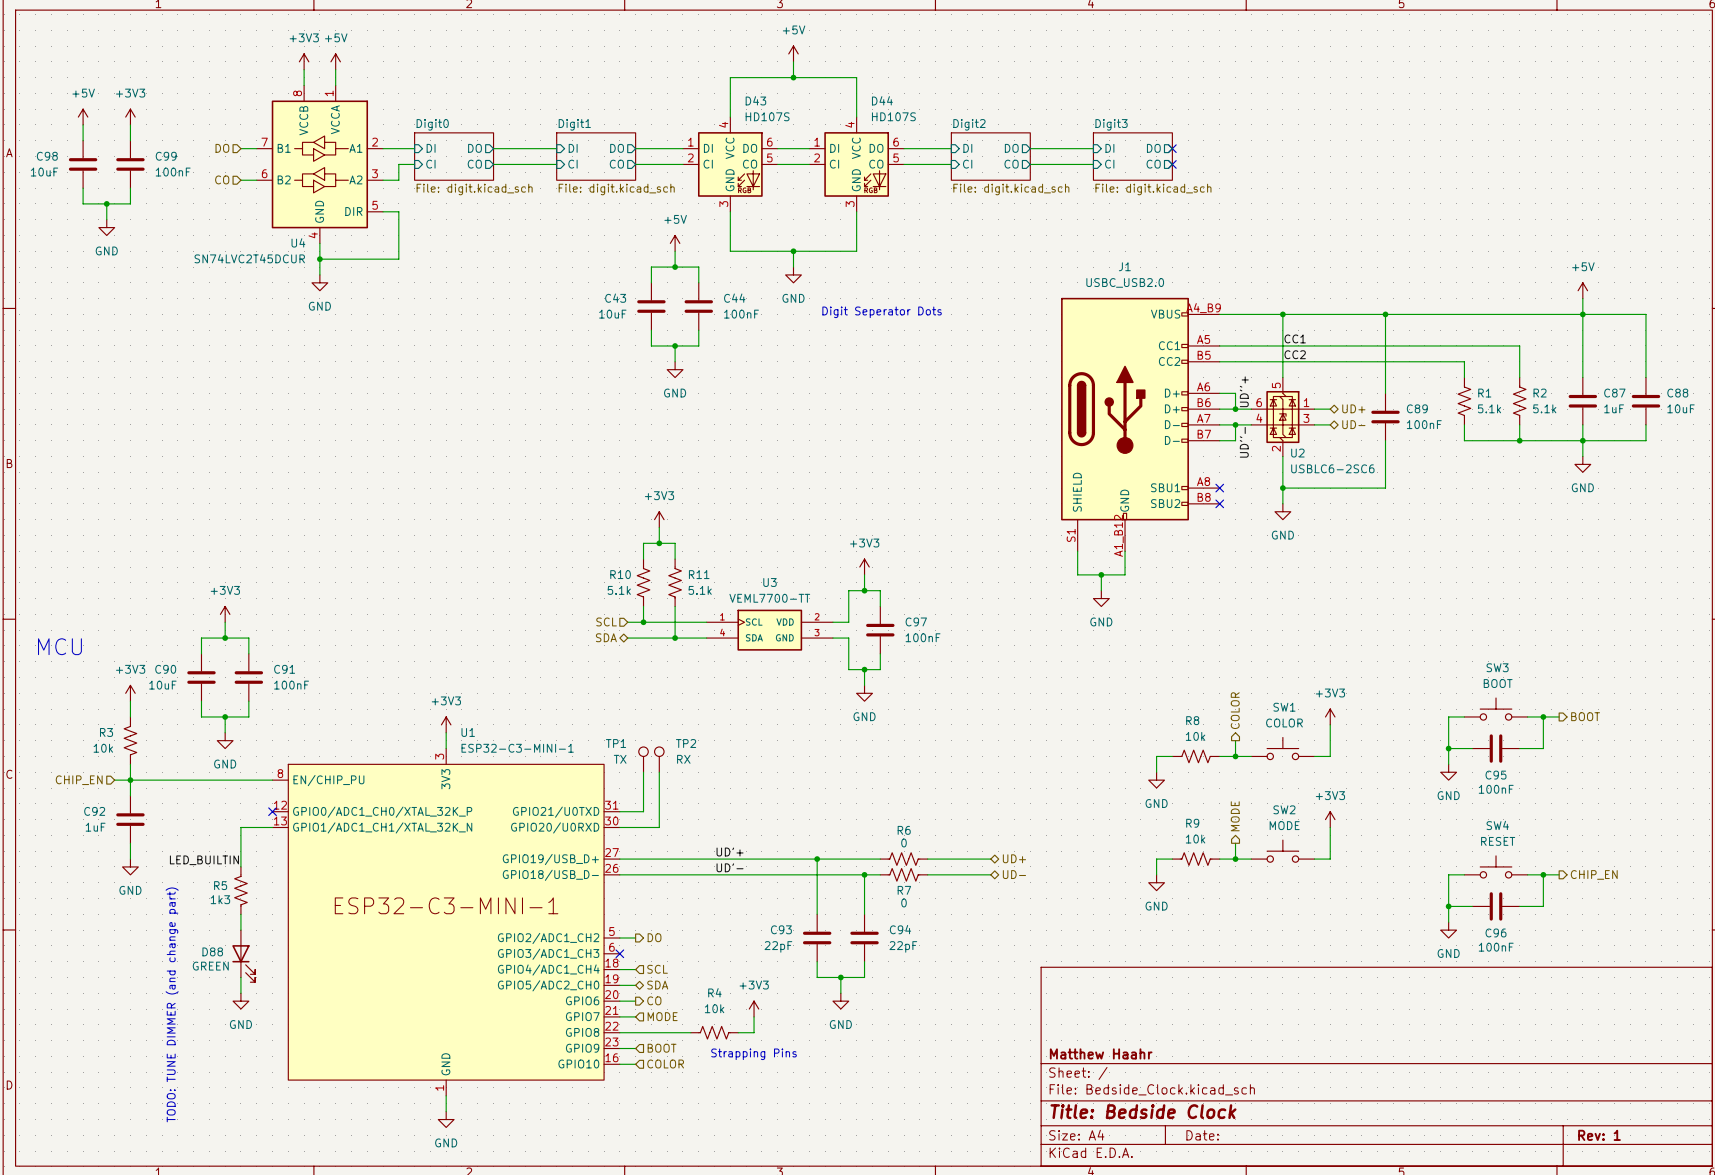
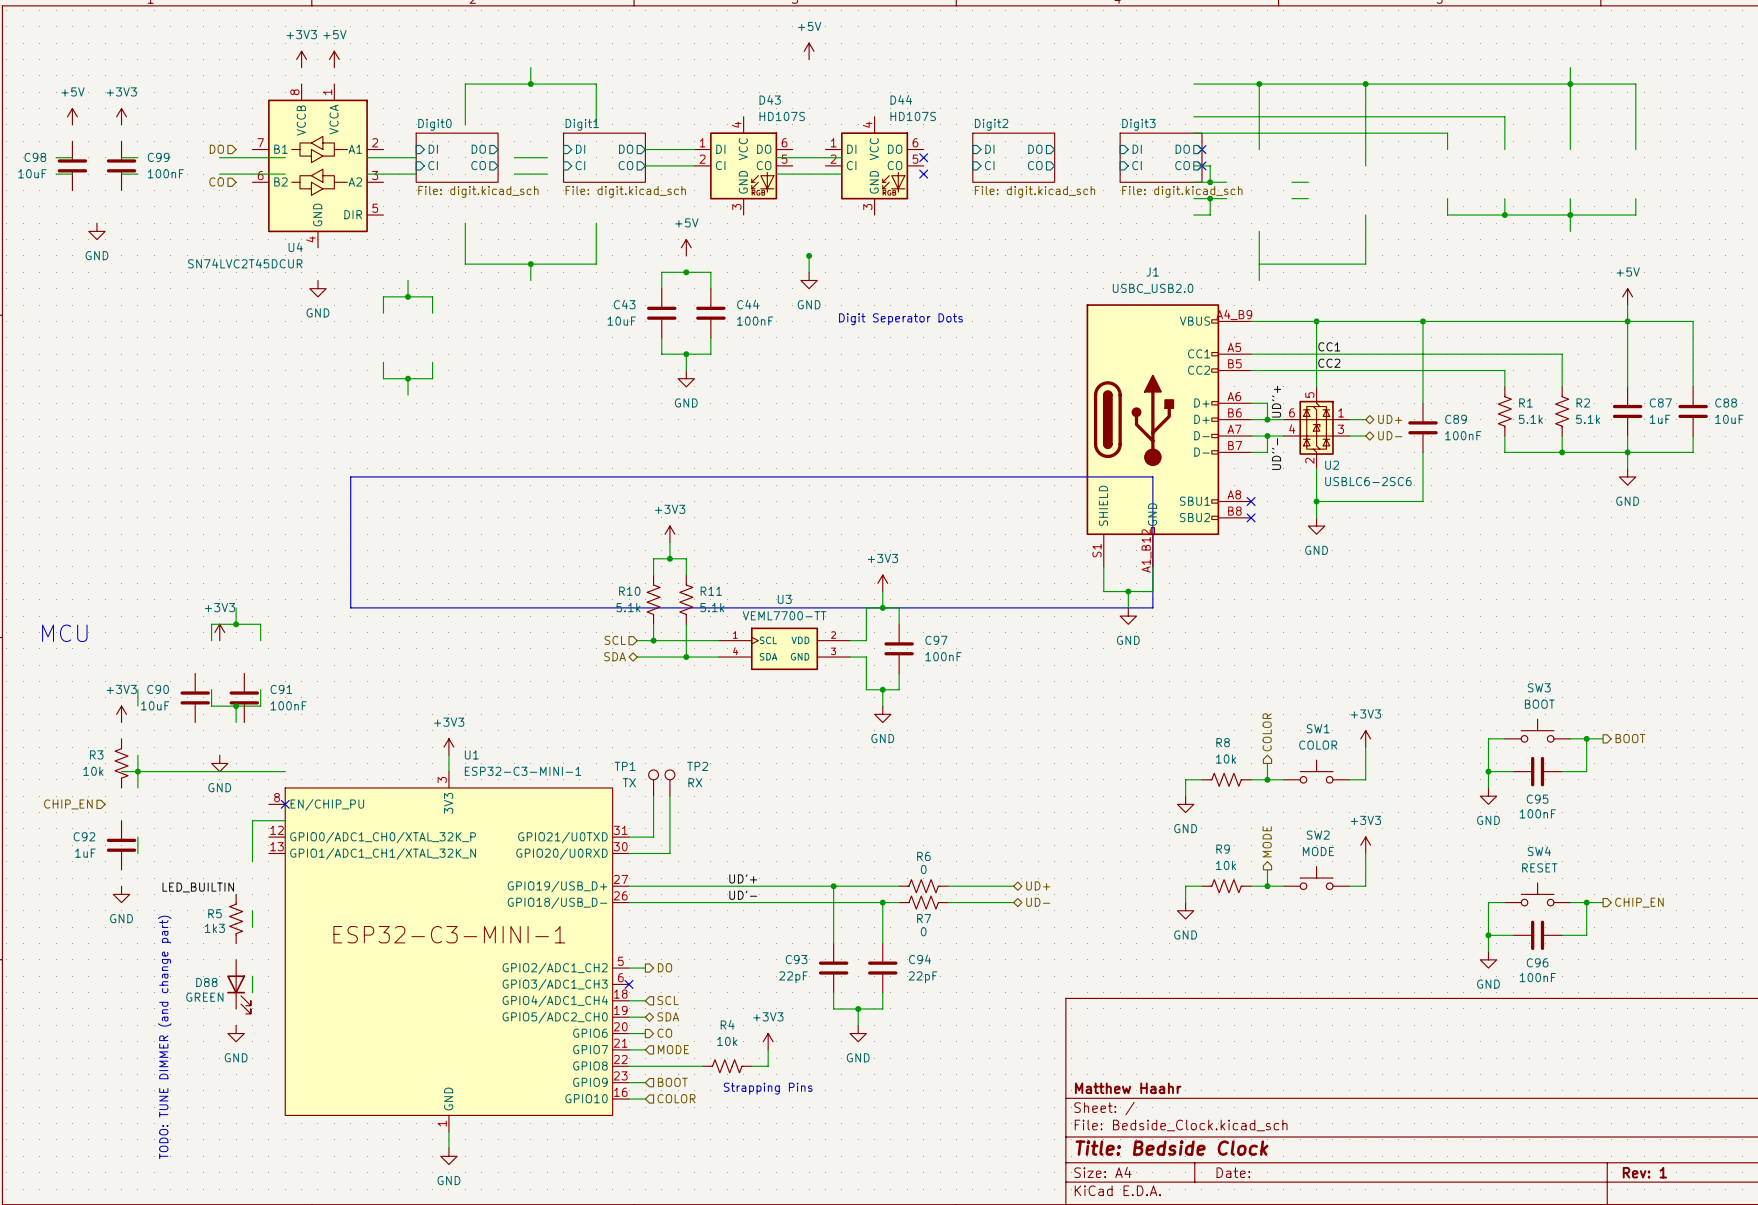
wire: (793, 61) (793, 77) -> none
wire: (304, 69) (304, 85) -> none
wire: (335, 69) (335, 85) -> none
wire: none -> (530, 67) (530, 84)
wire: none -> (1570, 67) (1570, 149)
junction: (793, 77) -> none
junction: none -> (530, 84)
wire: none -> (1193, 84) (1635, 84) (1635, 149)
wire: none -> (1259, 84) (1259, 149)
junction: none -> (1259, 84)
wire: none -> (1365, 84) (1365, 165)
junction: none -> (1365, 84)
junction: none -> (1570, 84)
wire: (730, 117) (730, 77) (856, 77) (856, 117) -> none
wire: none -> (1193, 116) (1504, 116) (1504, 149)
wire: (83, 124) (83, 140) -> none
wire: (130, 124) (130, 140) -> none
wire: none -> (465, 124) (465, 84) (596, 84) (596, 124)
wire: none -> (1193, 133) (1447, 133) (1447, 149)
wire: (240, 148) (256, 148) -> (121, 157) (137, 157)
wire: (383, 148) (414, 148) -> (514, 157) (547, 157)
wire: (493, 148) (556, 148) -> none
wire: (777, 148) (809, 148) -> none
wire: (904, 148) (951, 148) -> none
wire: (1030, 148) (1093, 148) -> none
wire: none -> (56, 157) (72, 157)
wire: none -> (219, 157) (285, 157)
wire: none -> (367, 157) (416, 157)
wire: none -> (776, 157) (841, 157)
no-connect mark: none -> (923, 157)
wire: (414, 164) (398, 164) (398, 180) (383, 180) -> none
wire: (493, 164) (556, 164) -> none
wire: (777, 164) (809, 164) -> none
wire: (904, 164) (951, 164) -> none
wire: (1030, 164) (1093, 164) -> none
wire: none -> (1193, 165) (1210, 165) (1210, 182)
wire: none -> (56, 174) (72, 174)
wire: none -> (219, 174) (285, 174)
wire: none -> (367, 174) (416, 174)
wire: none -> (514, 174) (547, 174)
wire: none -> (776, 174) (841, 174)
no-connect mark: none -> (923, 174)
wire: (240, 180) (256, 180) -> (121, 174) (137, 174)
wire: none -> (1193, 182) (1226, 182)
junction: none -> (1210, 182)
wire: none -> (1292, 182) (1308, 182)
wire: (83, 188) (83, 203) (130, 203) (130, 188) -> none
wire: none -> (1193, 198) (1226, 198)
wire: none -> (1210, 198) (1210, 215) (1193, 215)
junction: none -> (1210, 198)
wire: none -> (1292, 198) (1308, 198)
wire: none -> (1447, 198) (1447, 215) (1635, 215) (1635, 198)
wire: none -> (1504, 198) (1504, 215)
wire: none -> (1570, 198) (1570, 231)
wire: (106, 203) (106, 219) -> none
junction: (106, 203) -> none
wire: (383, 211) (398, 211) (398, 259) (319, 259) -> none
wire: (730, 211) (730, 251) (856, 251) (856, 211) -> none
wire: none -> (1365, 215) (1365, 264) (1259, 264)
junction: none -> (1504, 215)
junction: none -> (1570, 215)
wire: none -> (465, 223) (465, 264) (596, 264) (596, 223)
wire: none -> (1259, 231) (1259, 280)
wire: (319, 243) (319, 274) -> none
wire: (675, 251) (675, 267) -> (530, 264) (530, 280)
junction: (319, 259) -> none
junction: none -> (530, 264)
wire: none -> (408, 280) (408, 296)
junction: none -> (408, 296)
wire: none -> (383, 313) (383, 296) (432, 296) (432, 313)
wire: none -> (383, 362) (383, 378) (432, 378) (432, 362)
wire: none -> (408, 378) (408, 395)
junction: none -> (408, 378)
line: none -> (350, 476) (1152, 476) (1152, 607) (350, 607) (350, 476)
junction: none -> (236, 624)
wire: (225, 622) (225, 638) -> (236, 607) (236, 624)
junction: (225, 638) -> none
text position: MCU (59, 646) -> MCU (64, 633)
wire: (201, 653) (201, 638) (248, 638) (248, 653) -> (211, 640) (211, 624) (260, 624) (260, 640)
junction: none -> (236, 706)
wire: (130, 701) (130, 716) -> (137, 689) (137, 706)
wire: (201, 701) (201, 716) (248, 716) (248, 701) -> (211, 689) (211, 706) (260, 706) (260, 689)
wire: (225, 716) (225, 732) -> (236, 706) (236, 722)
junction: (225, 716) -> none
wire: (130, 764) (130, 795) -> (137, 755) (137, 787)
wire: (114, 780) (272, 780) -> (121, 771) (285, 771)
junction position: (130, 780) -> (137, 771)
no-connect mark position: (272, 811) -> (285, 804)
wire: (272, 827) (240, 827) (240, 866) -> (285, 820) (252, 820) (252, 861)
wire: (130, 843) (130, 859) -> (137, 837) (137, 853)
wire: (240, 914) (240, 930) -> (252, 910) (252, 927)
wire: (240, 977) (240, 993) -> (252, 976) (252, 992)

